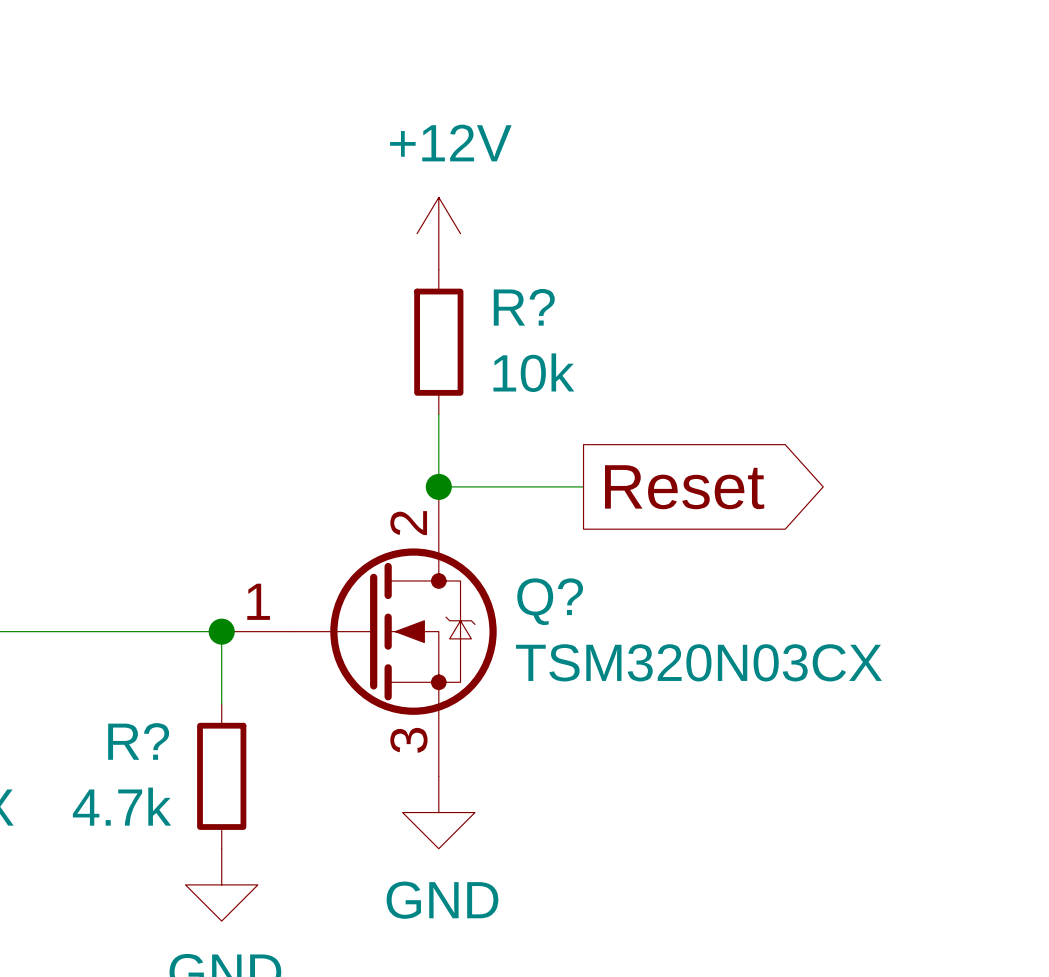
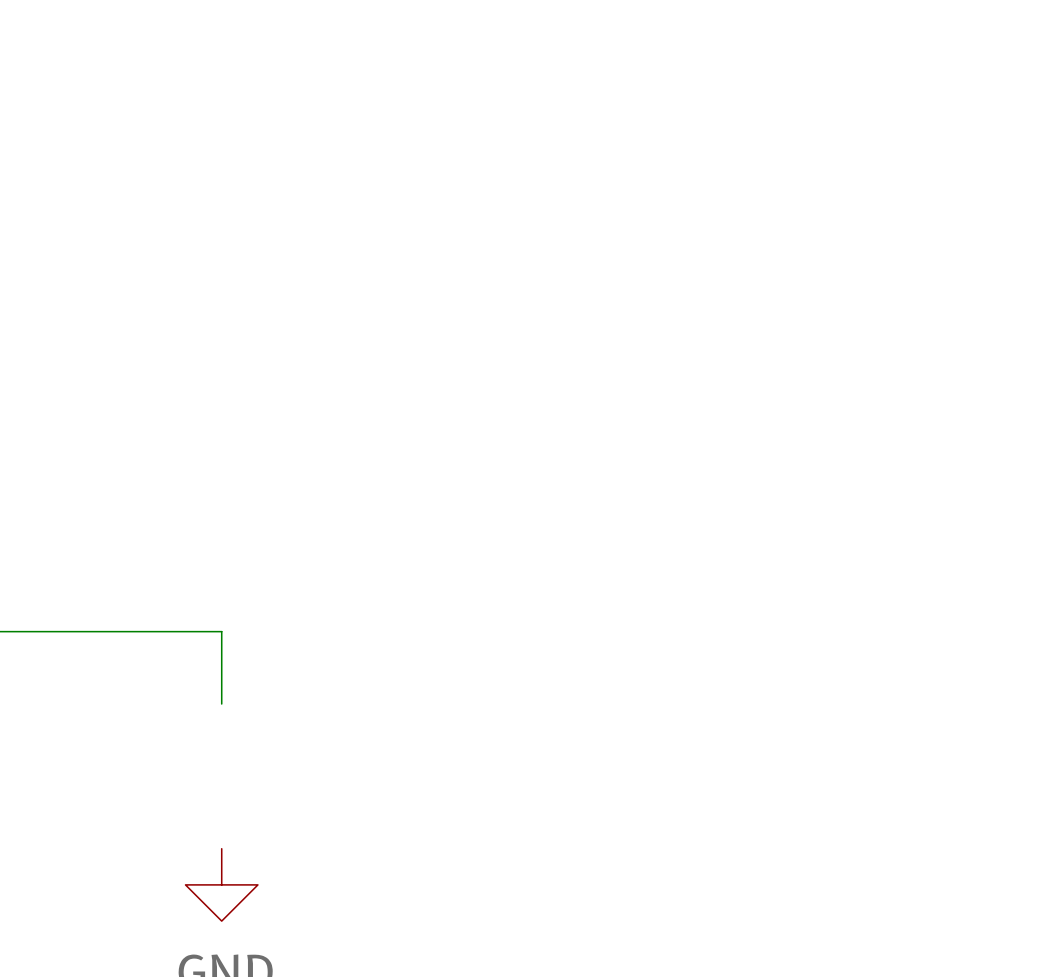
power symbol: +12V (438, 233) -> none
R?: 10k (438, 342) -> none
wire: (438, 414) (438, 486) (583, 486) -> none
junction: (438, 486) -> none
global label: Reset (684, 487) -> none
junction: (221, 631) -> none
Q?: TSM320N03CX (359, 631) -> none
R?: 4.7k (221, 776) -> none
power symbol: GND (438, 812) -> none

